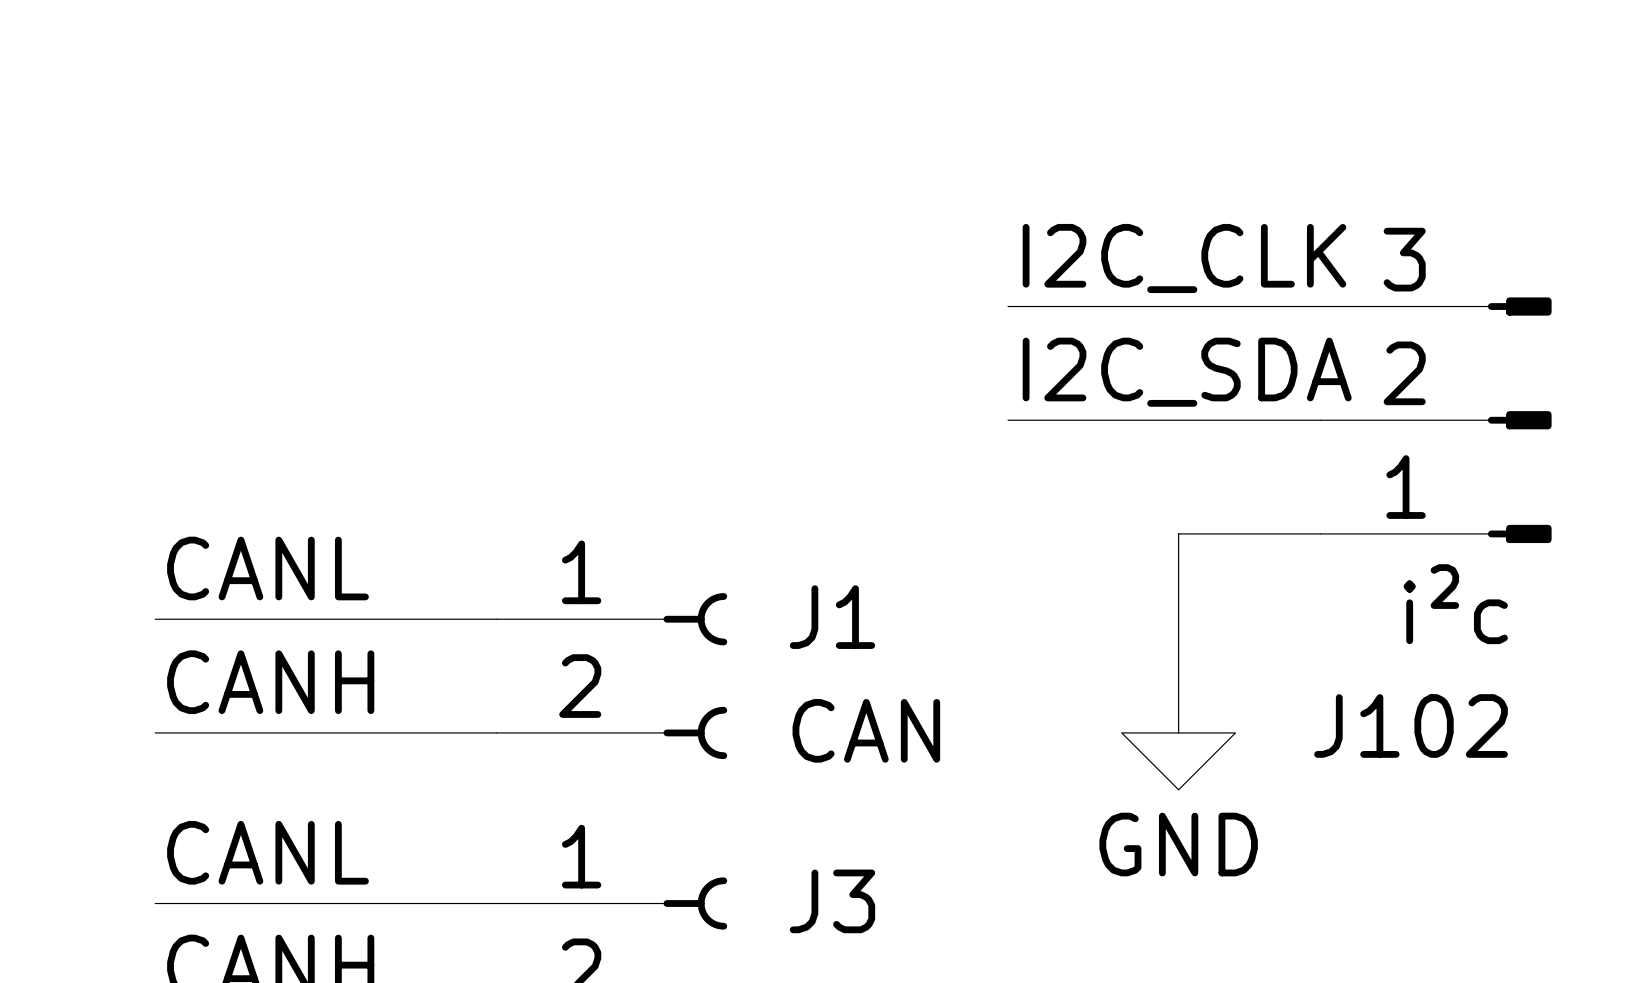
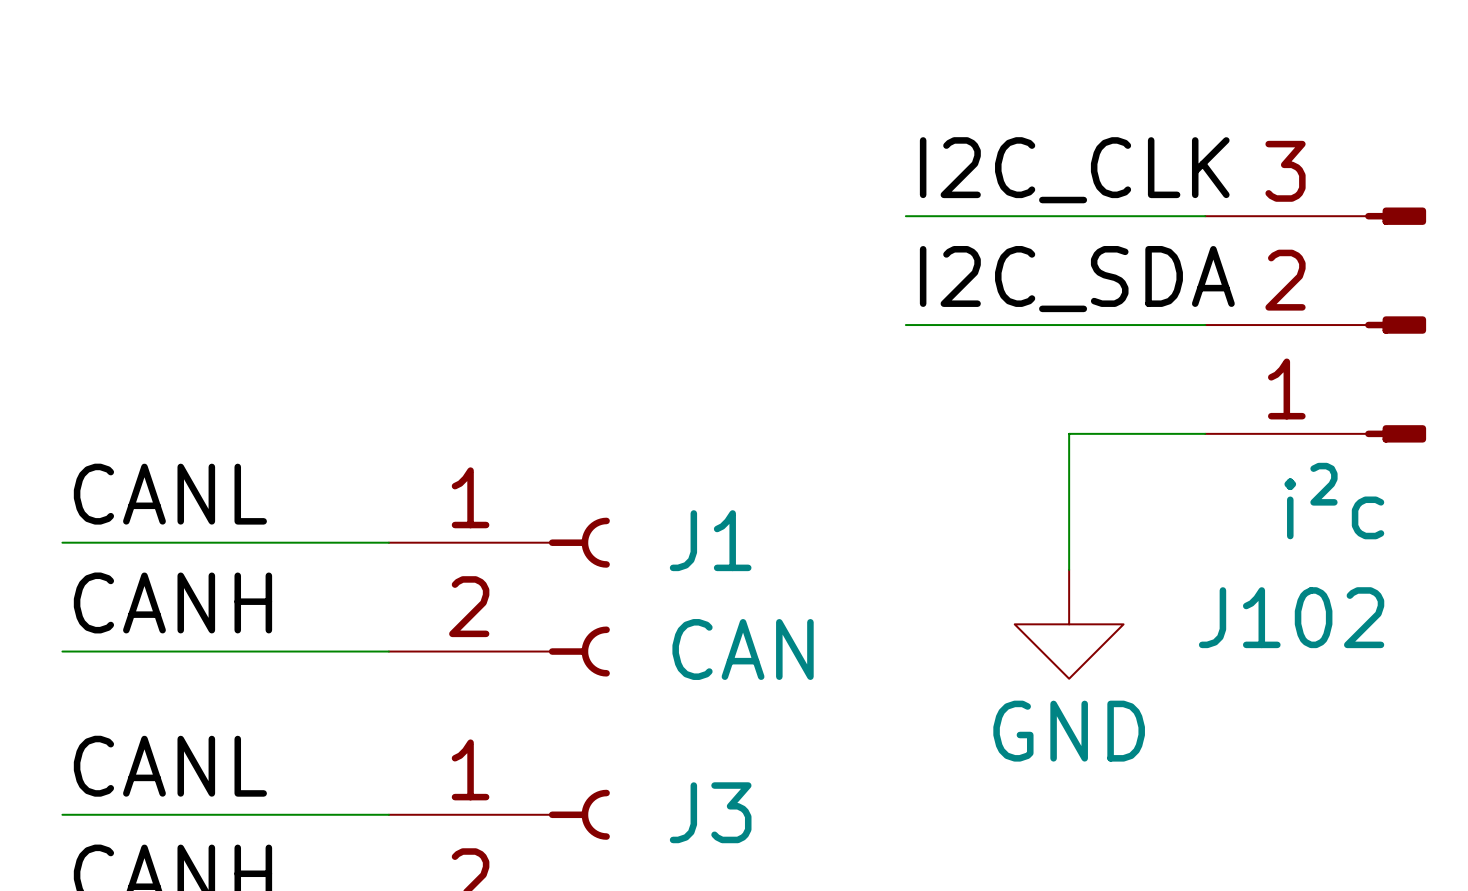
label position: I2C_CLK (1184, 258) -> I2C_CLK (1074, 170)
wire: (1008, 306) (1320, 306) -> (905, 216) (1205, 216)
label position: I2C_SDA (1187, 372) -> I2C_SDA (1077, 279)
wire: (1008, 420) (1320, 420) -> (905, 325) (1205, 325)
J102 position: (1436, 420) -> (1315, 325)
wire: (1320, 533) (1178, 533) (1178, 676) -> (1205, 433) (1069, 433) (1069, 569)
power symbol position: GND (1178, 732) -> GND (1069, 624)

